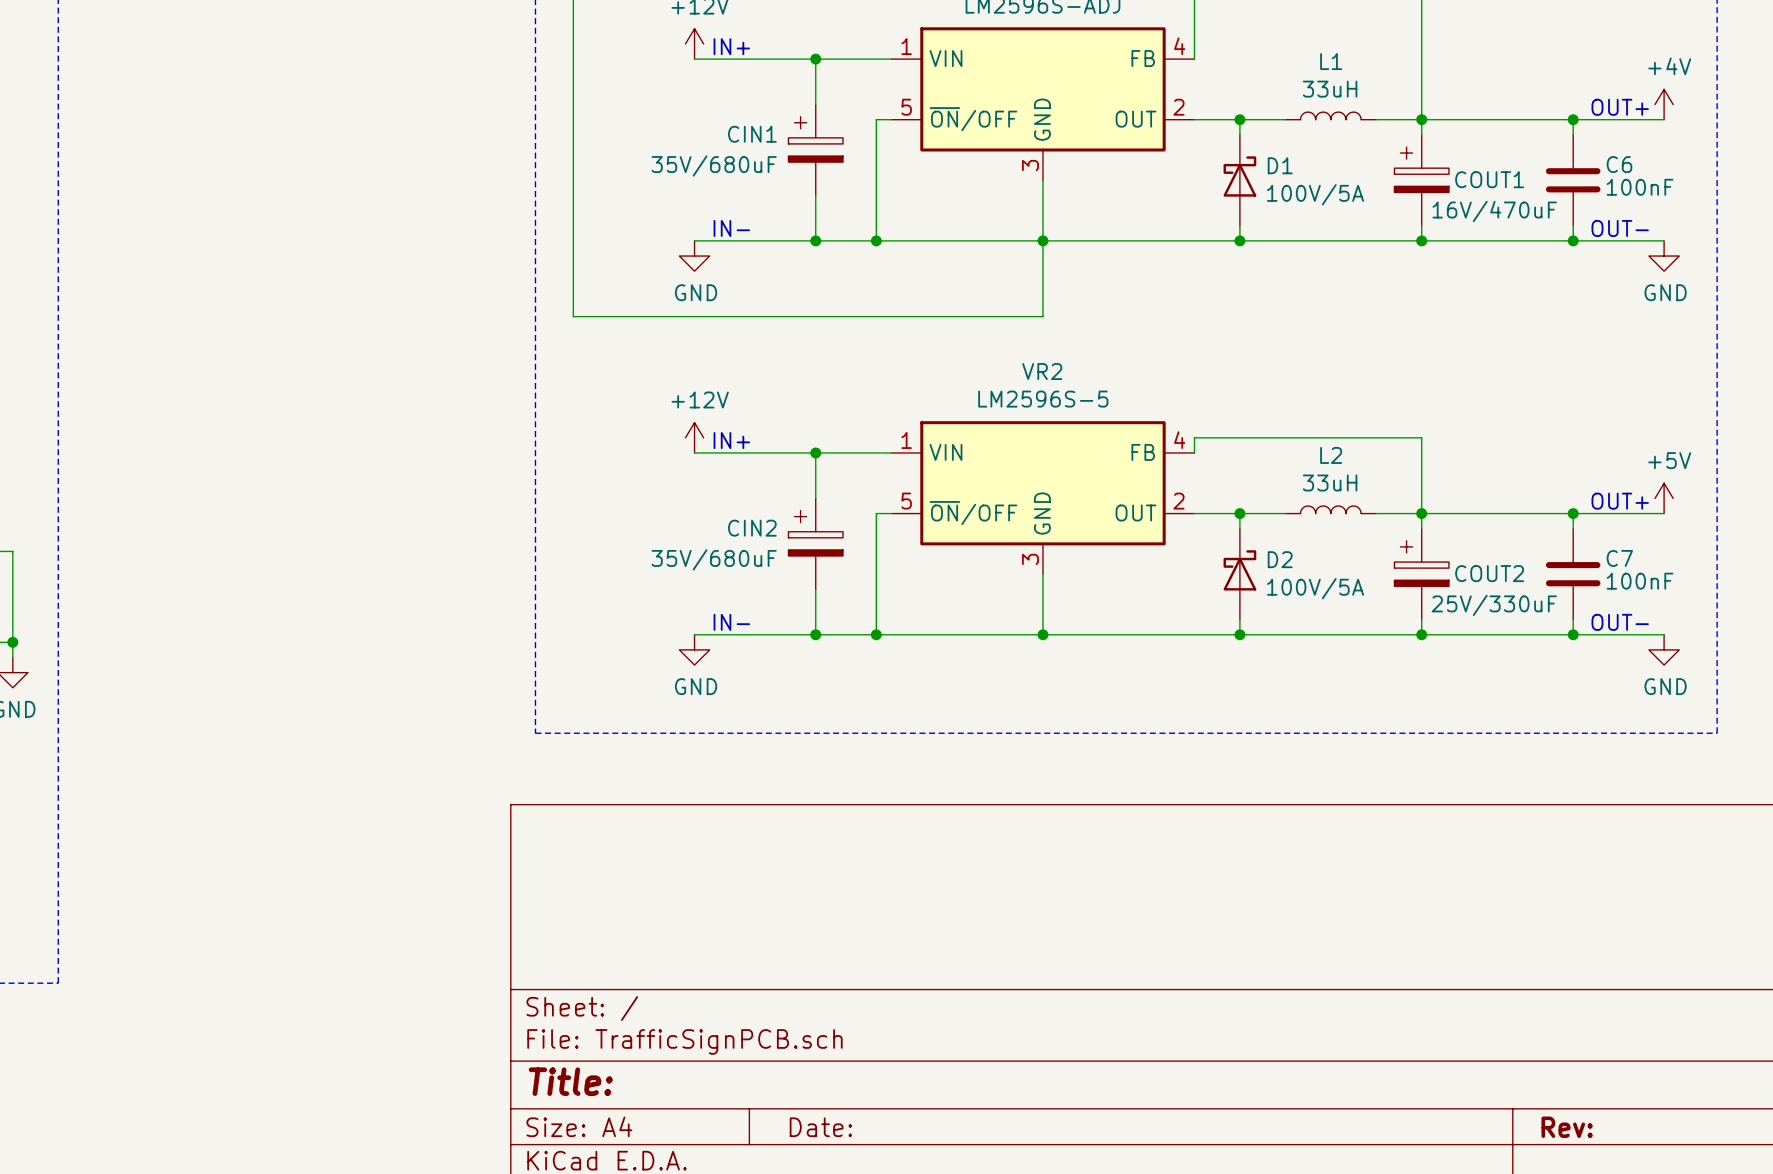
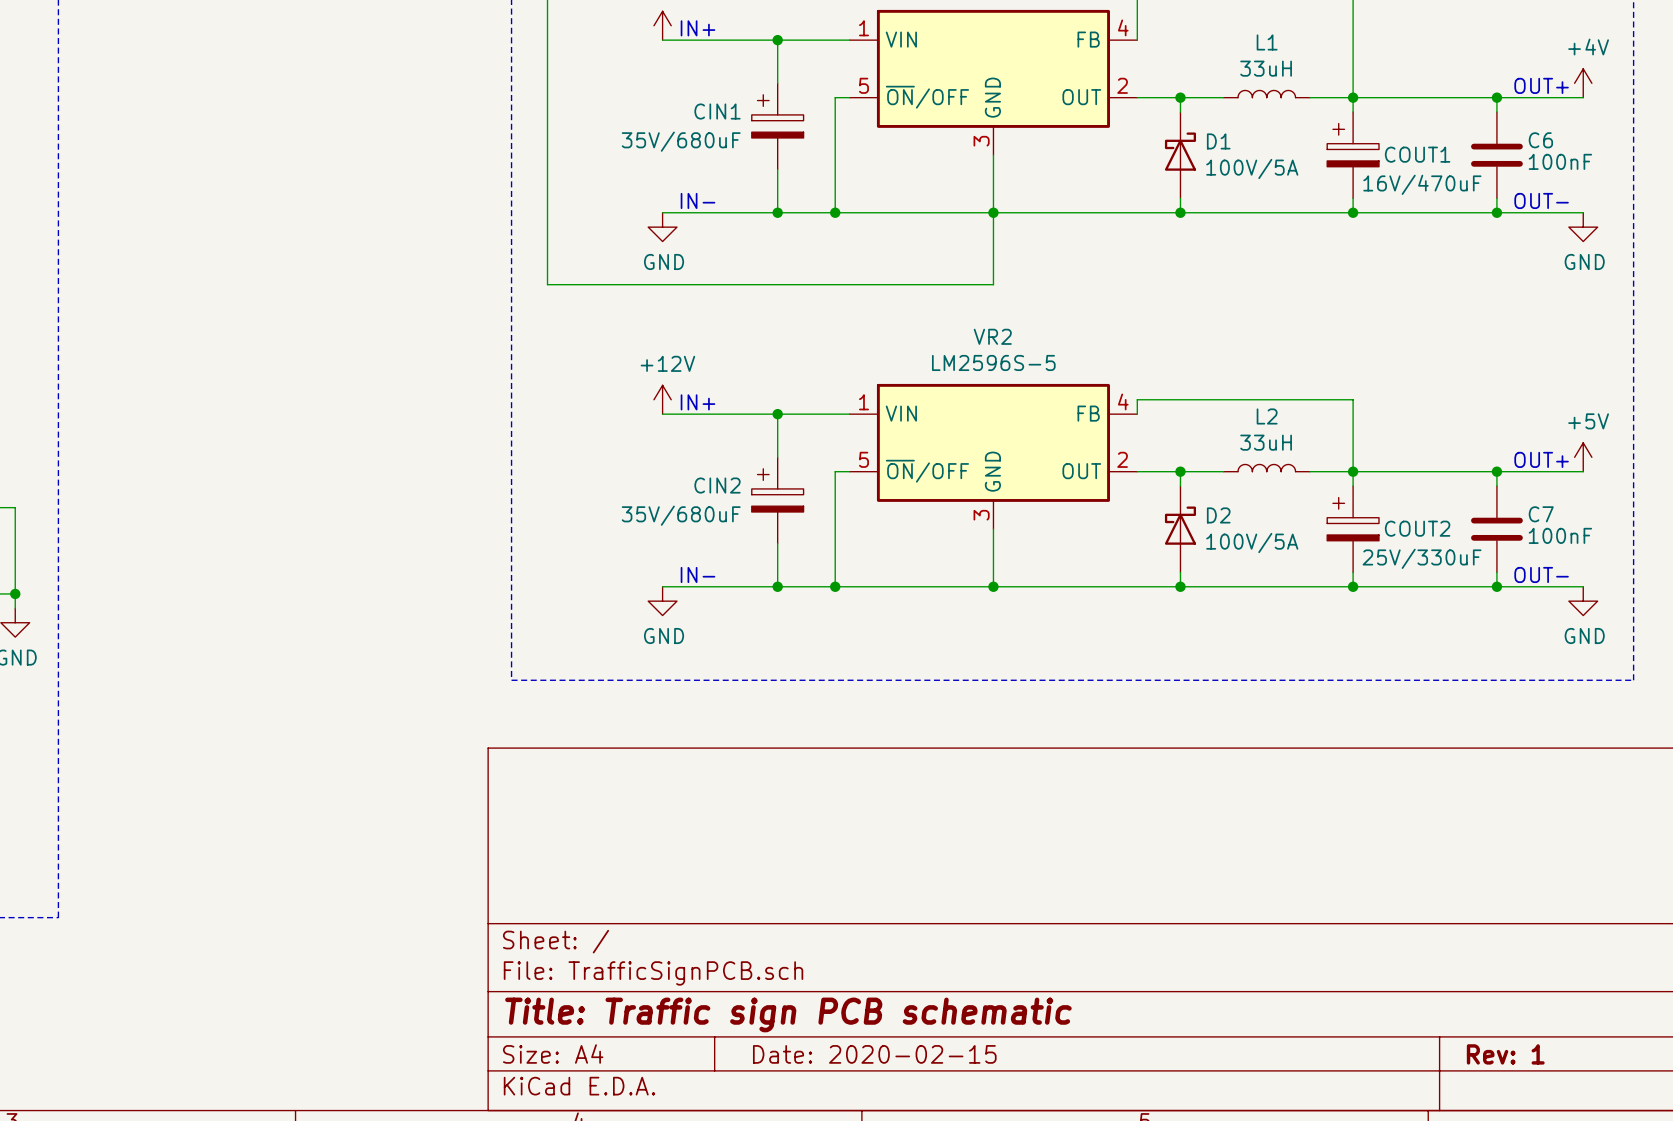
title block: Title: (570, 1081) -> Title: Traffic sign PCB schematic (788, 1014)
title block: Date: (820, 1127) -> Date: 2020-02-15 (874, 1054)
title block: Rev: (1567, 1127) -> Rev: 1 (1505, 1054)

